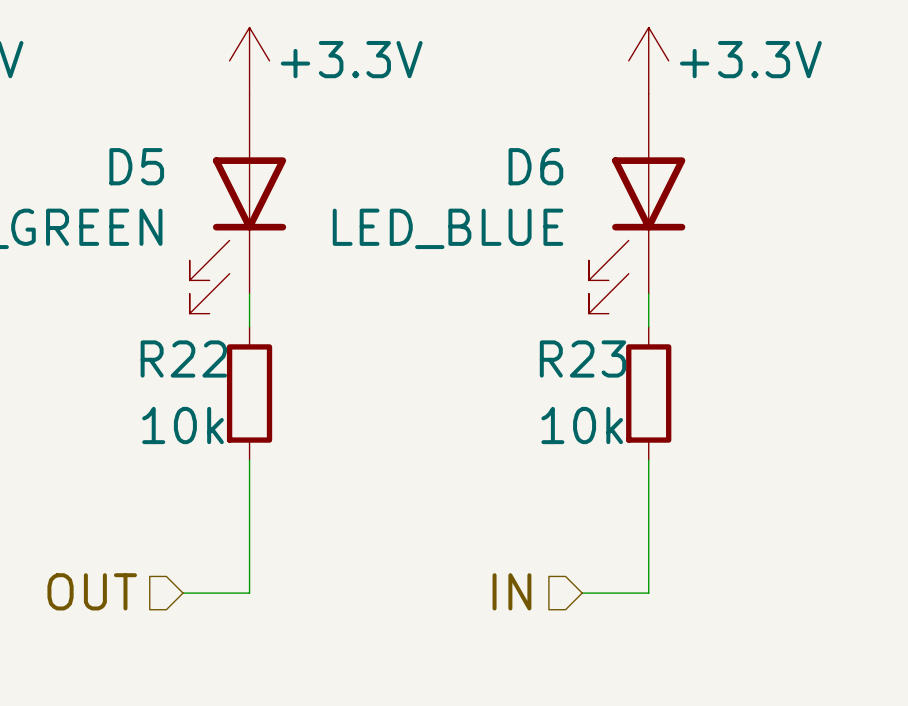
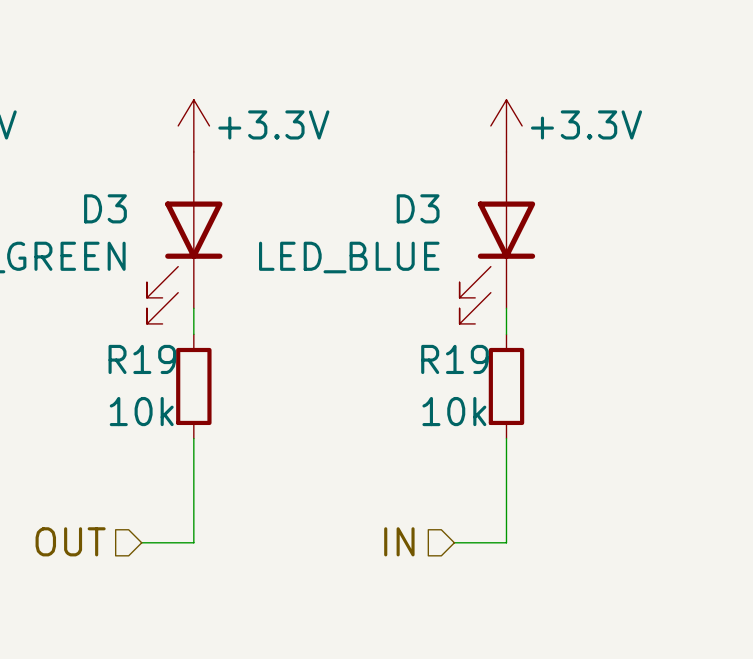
D5 name: D5 (136, 166) -> D3 (105, 208)
D6 name: D6 (535, 166) -> D3 (418, 208)
R22 name: R22 (183, 358) -> R19 (142, 359)
R23 name: R23 (582, 358) -> R19 (455, 359)

